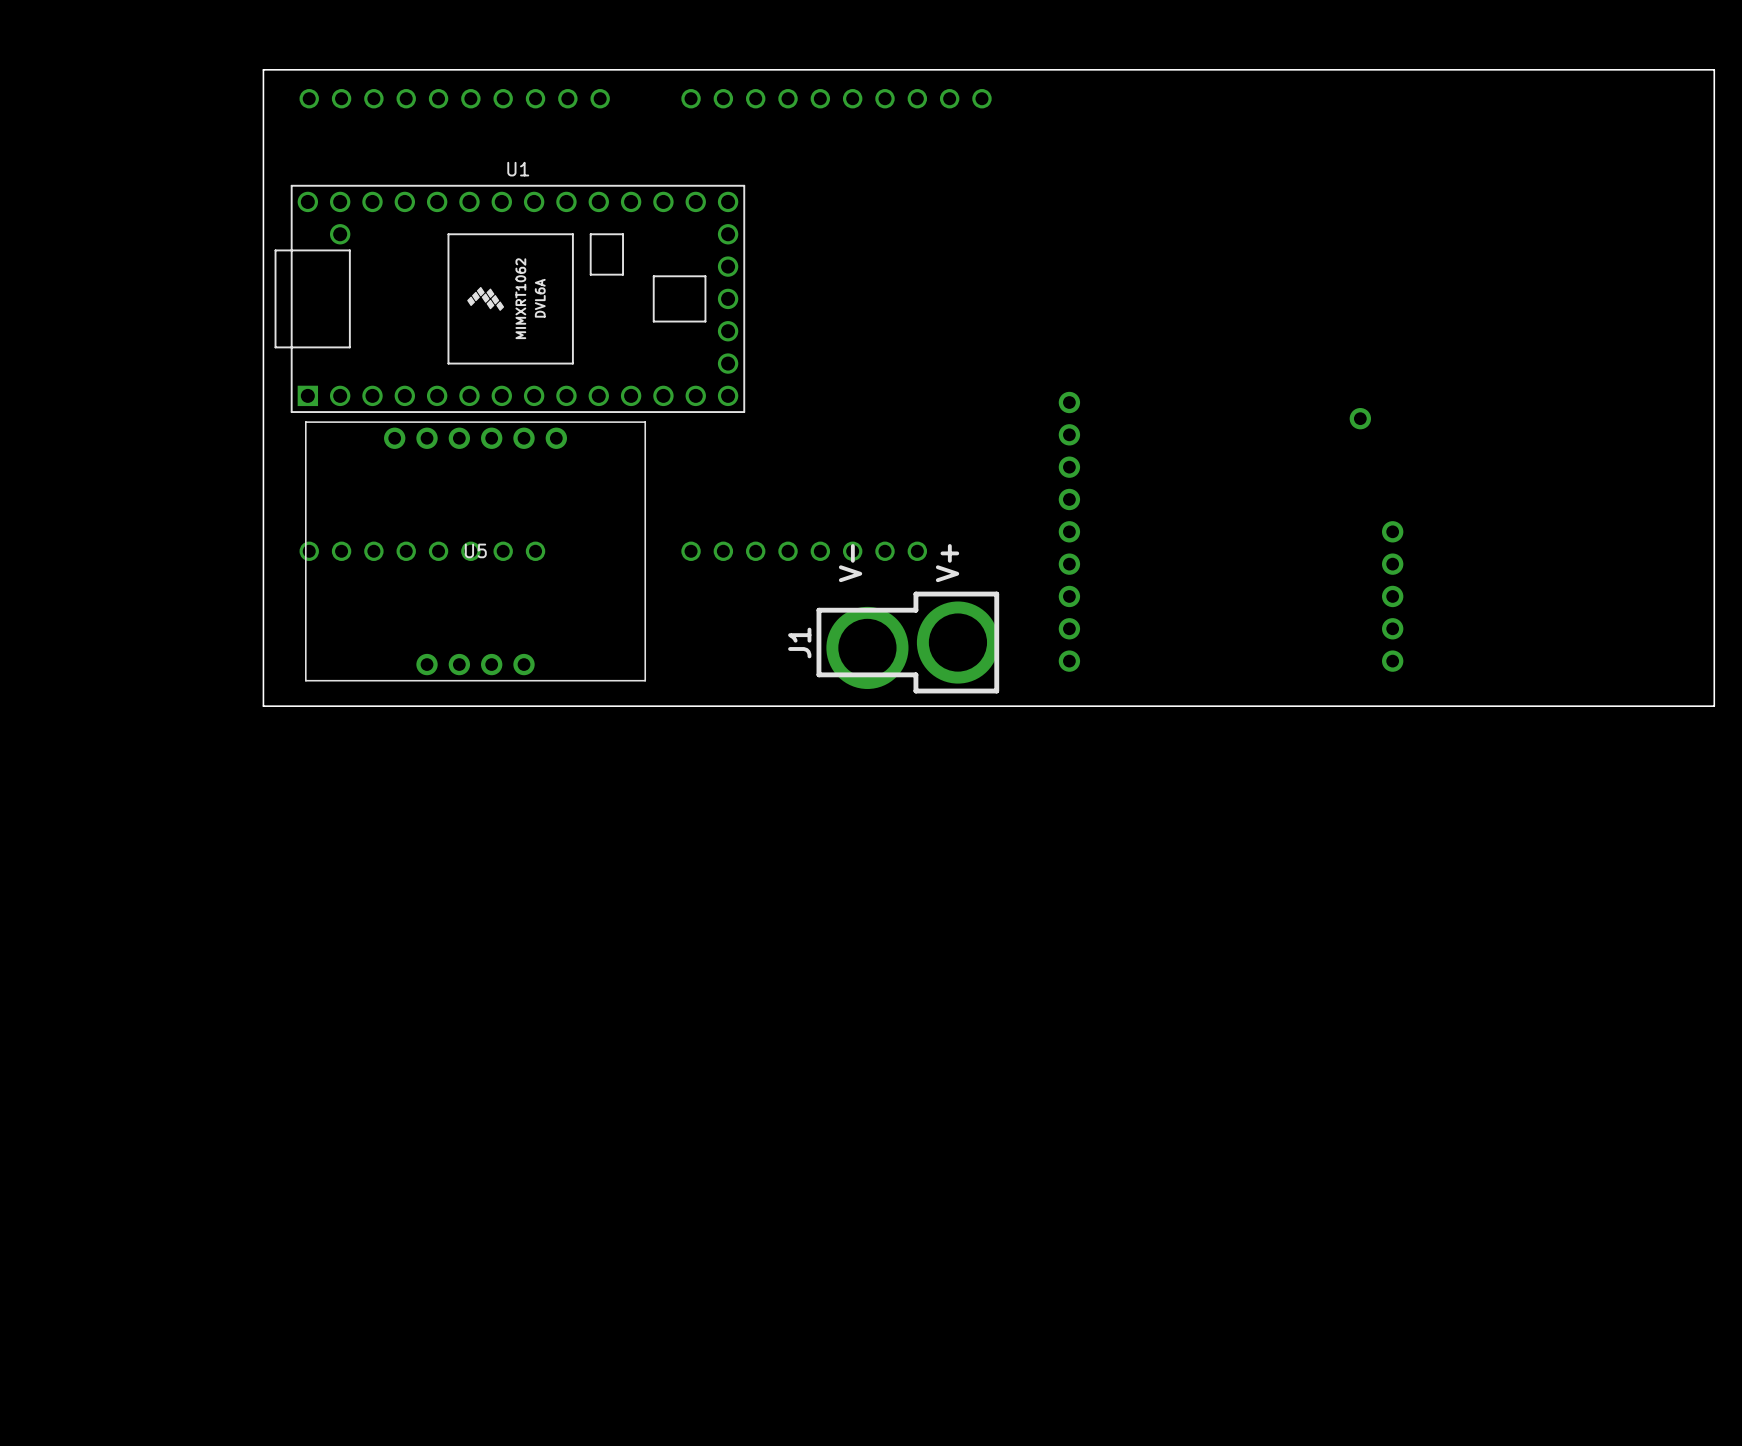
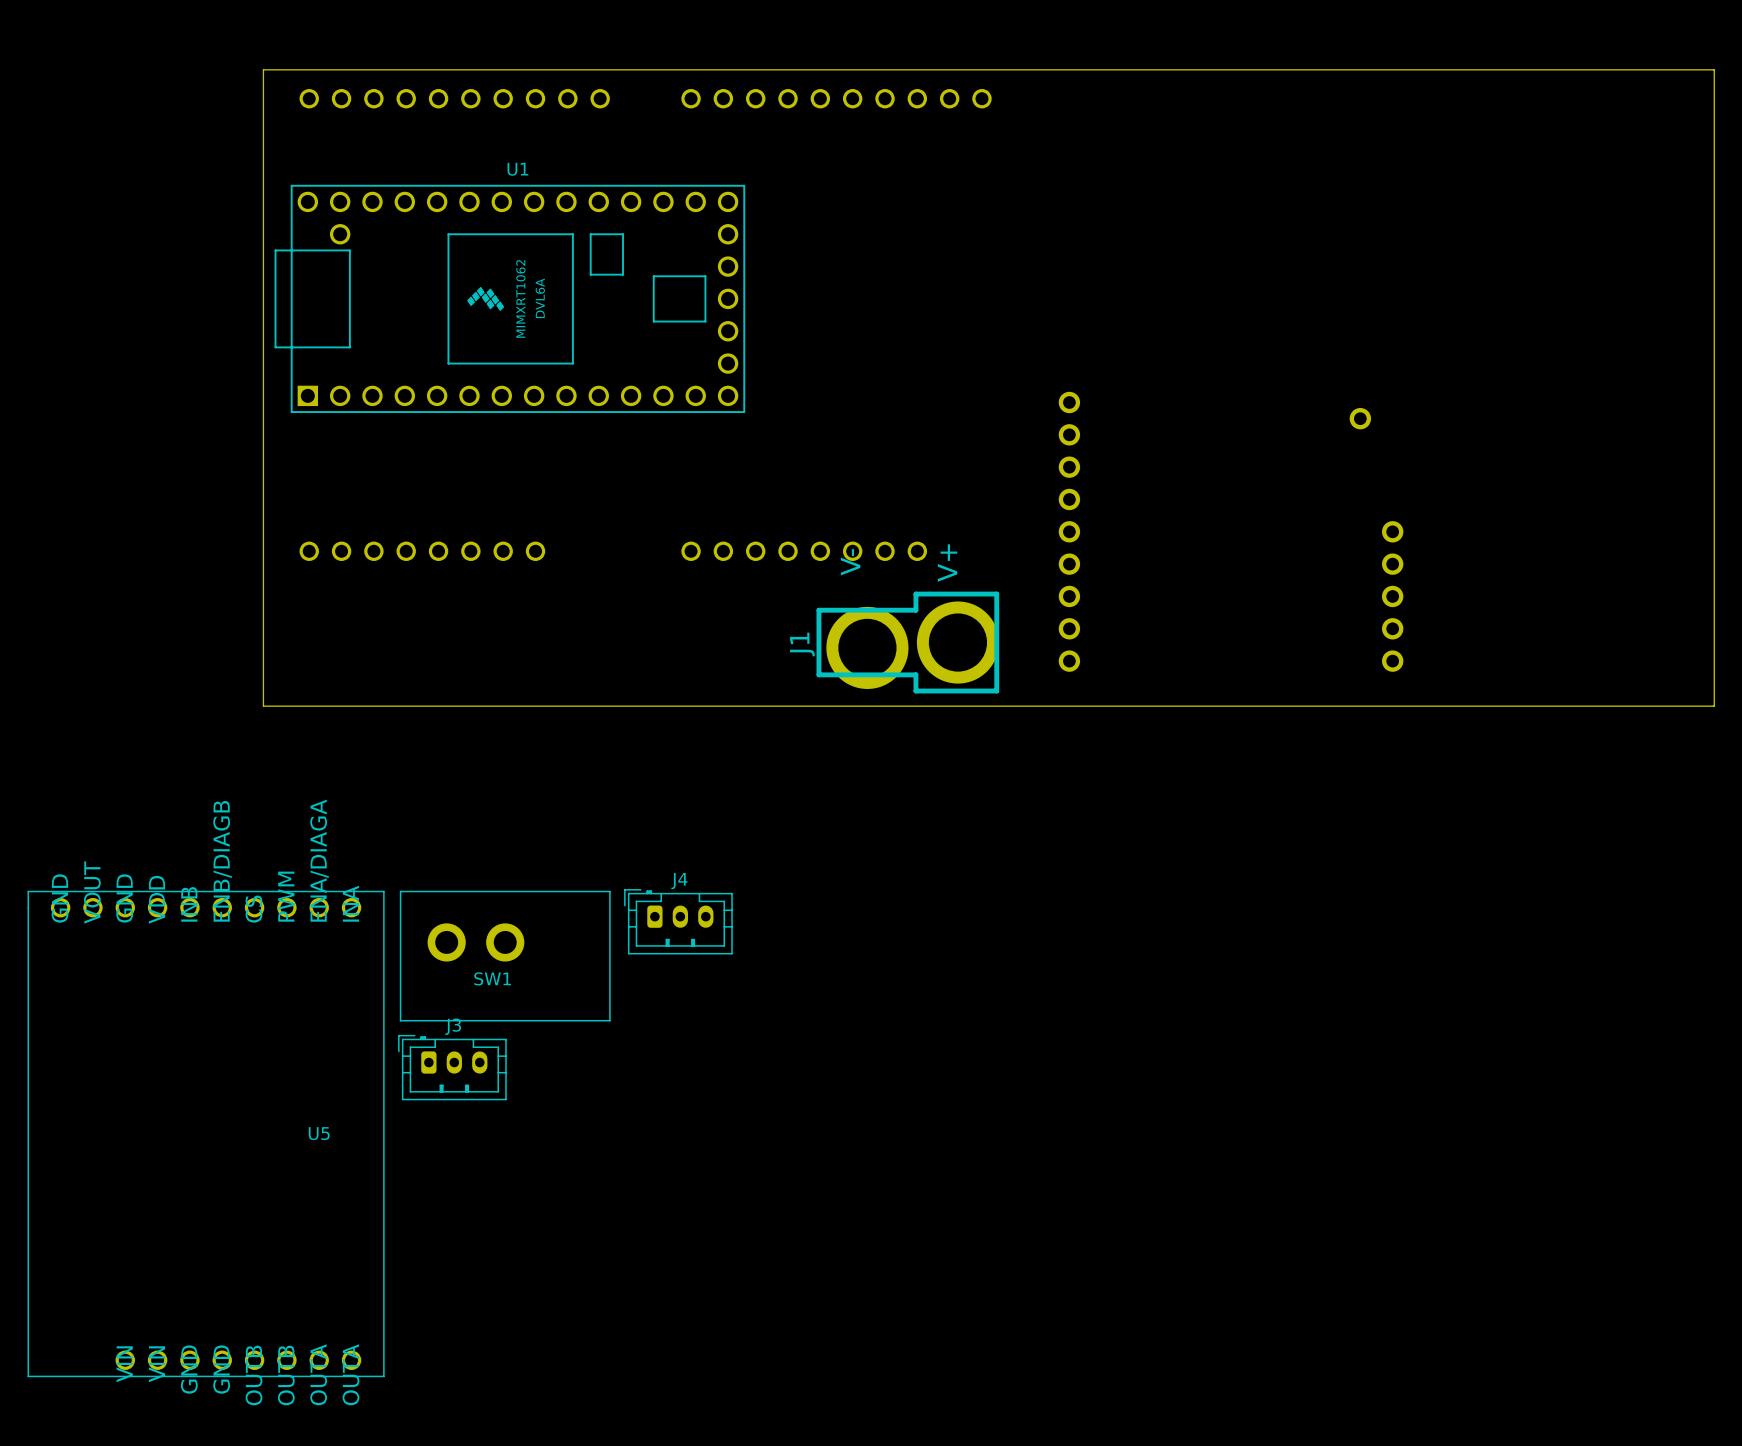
U5 footprint: [305, 421, 646, 682] -> [27, 890, 385, 1378]
U5 name position: U5 (475, 550) -> U5 (319, 1133)
J4: none -> (678, 921)
SW1: none -> (505, 956)
J3: none -> (452, 1067)

